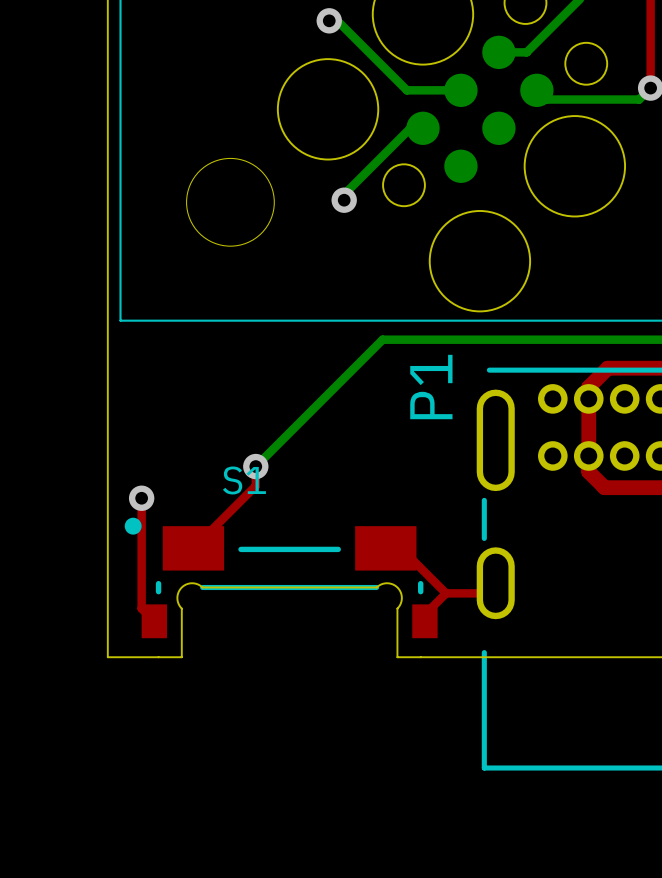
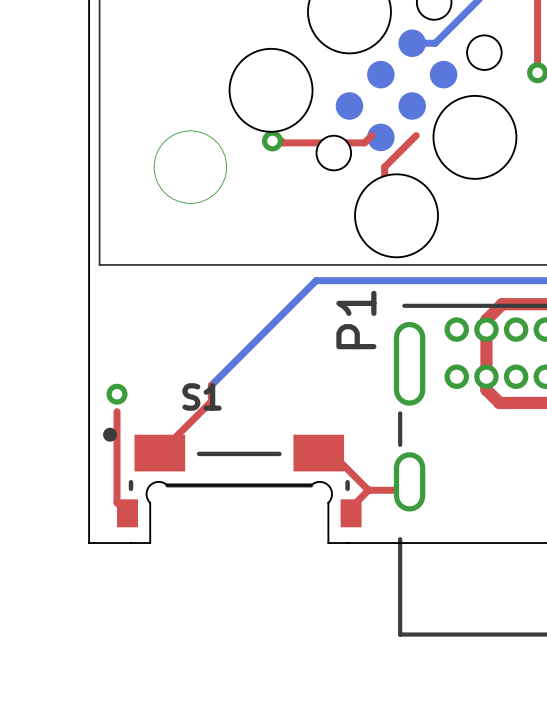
bottom track: (329, 20) (337, 20) (406, 90) (460, 90) -> none
via: (329, 20) -> none
bottom track: (650, 88) (639, 99) (546, 99) (536, 90) -> none
bottom track: (422, 128) (410, 128) (344, 194) (344, 200) -> none
top track: none -> (371, 135) (364, 142) (283, 142) (281, 140) (272, 140)
top track: none -> (416, 135) (384, 167) (386, 245)
via position: (344, 200) -> (272, 140)
via: (255, 466) -> none
via position: (141, 498) -> (117, 394)

